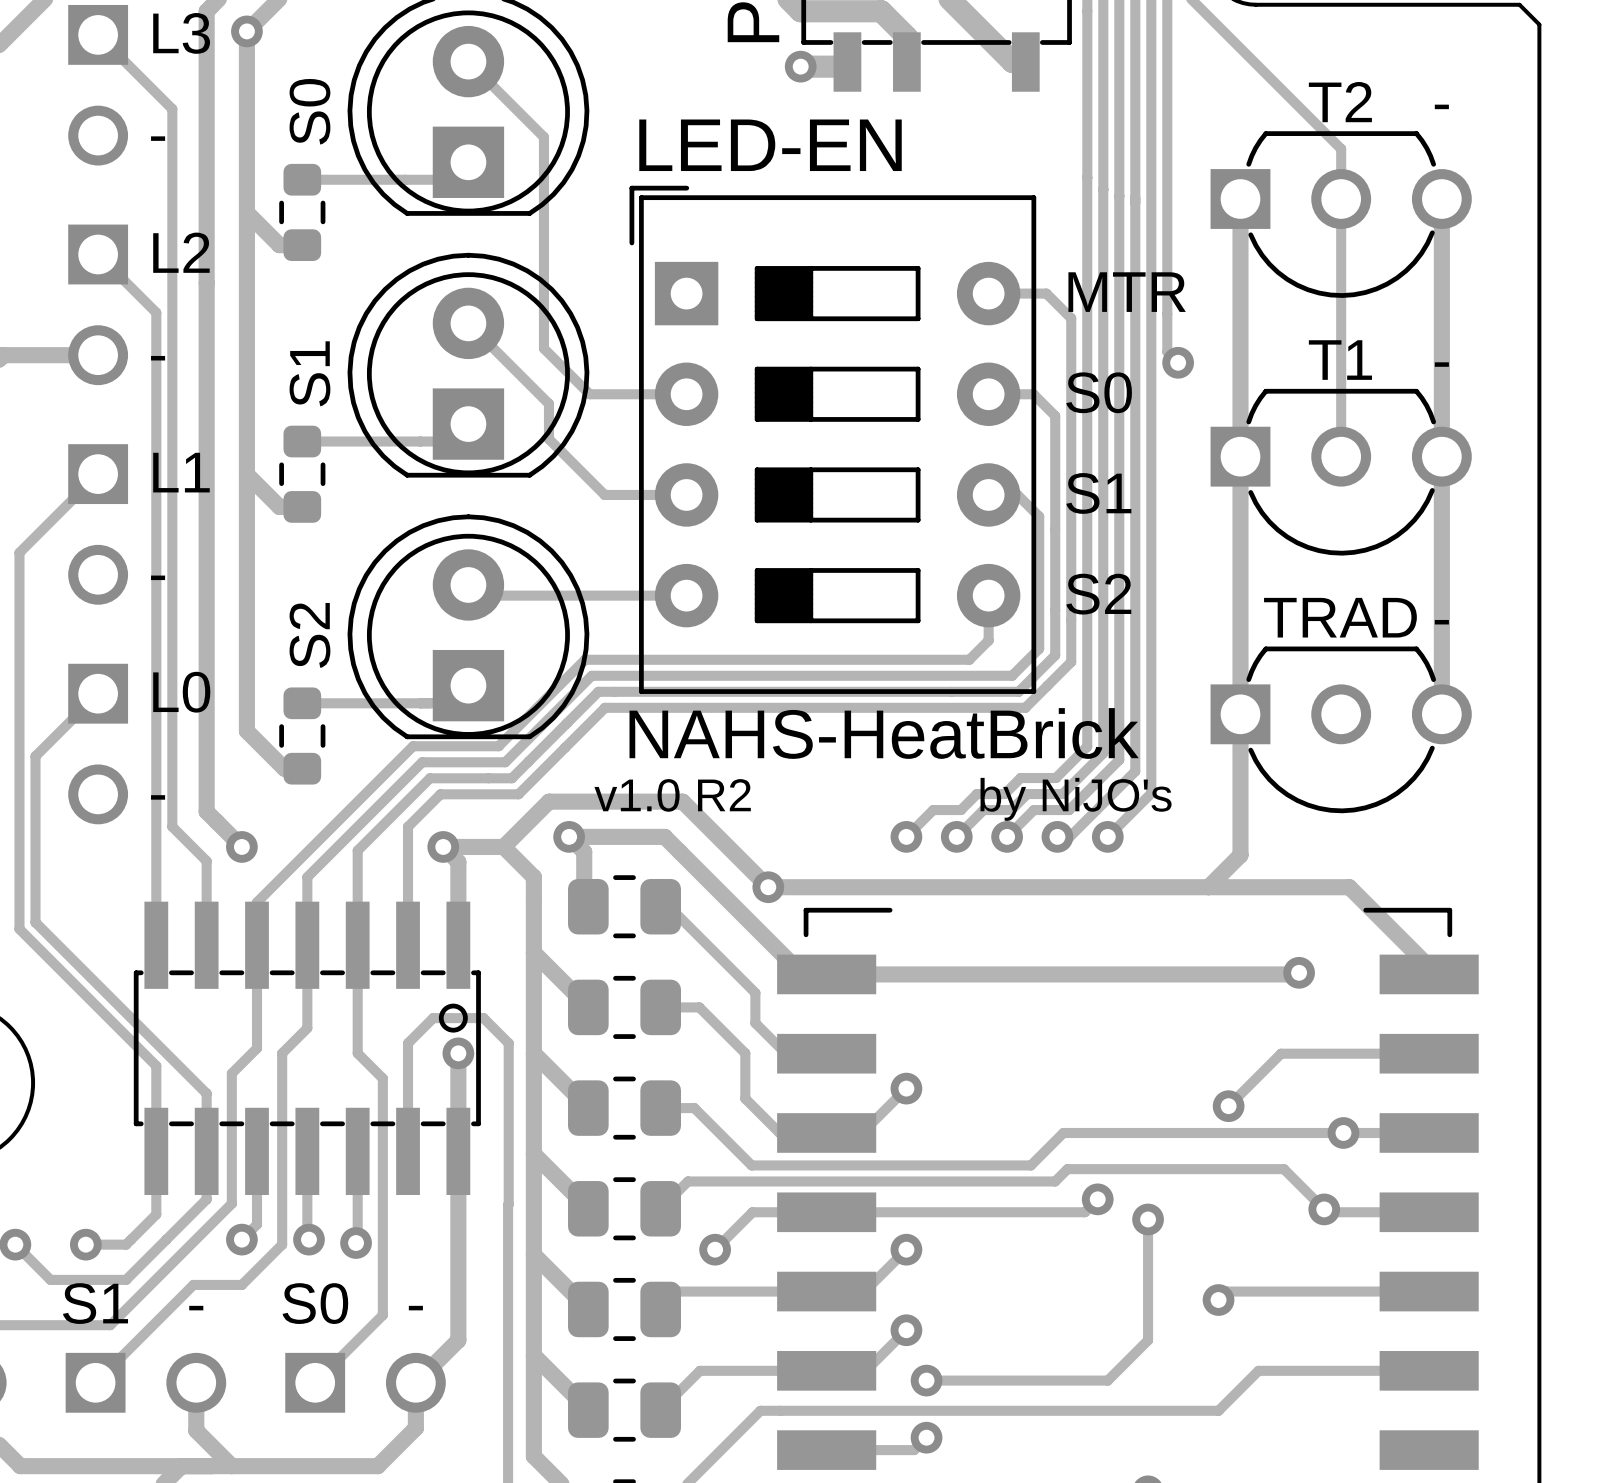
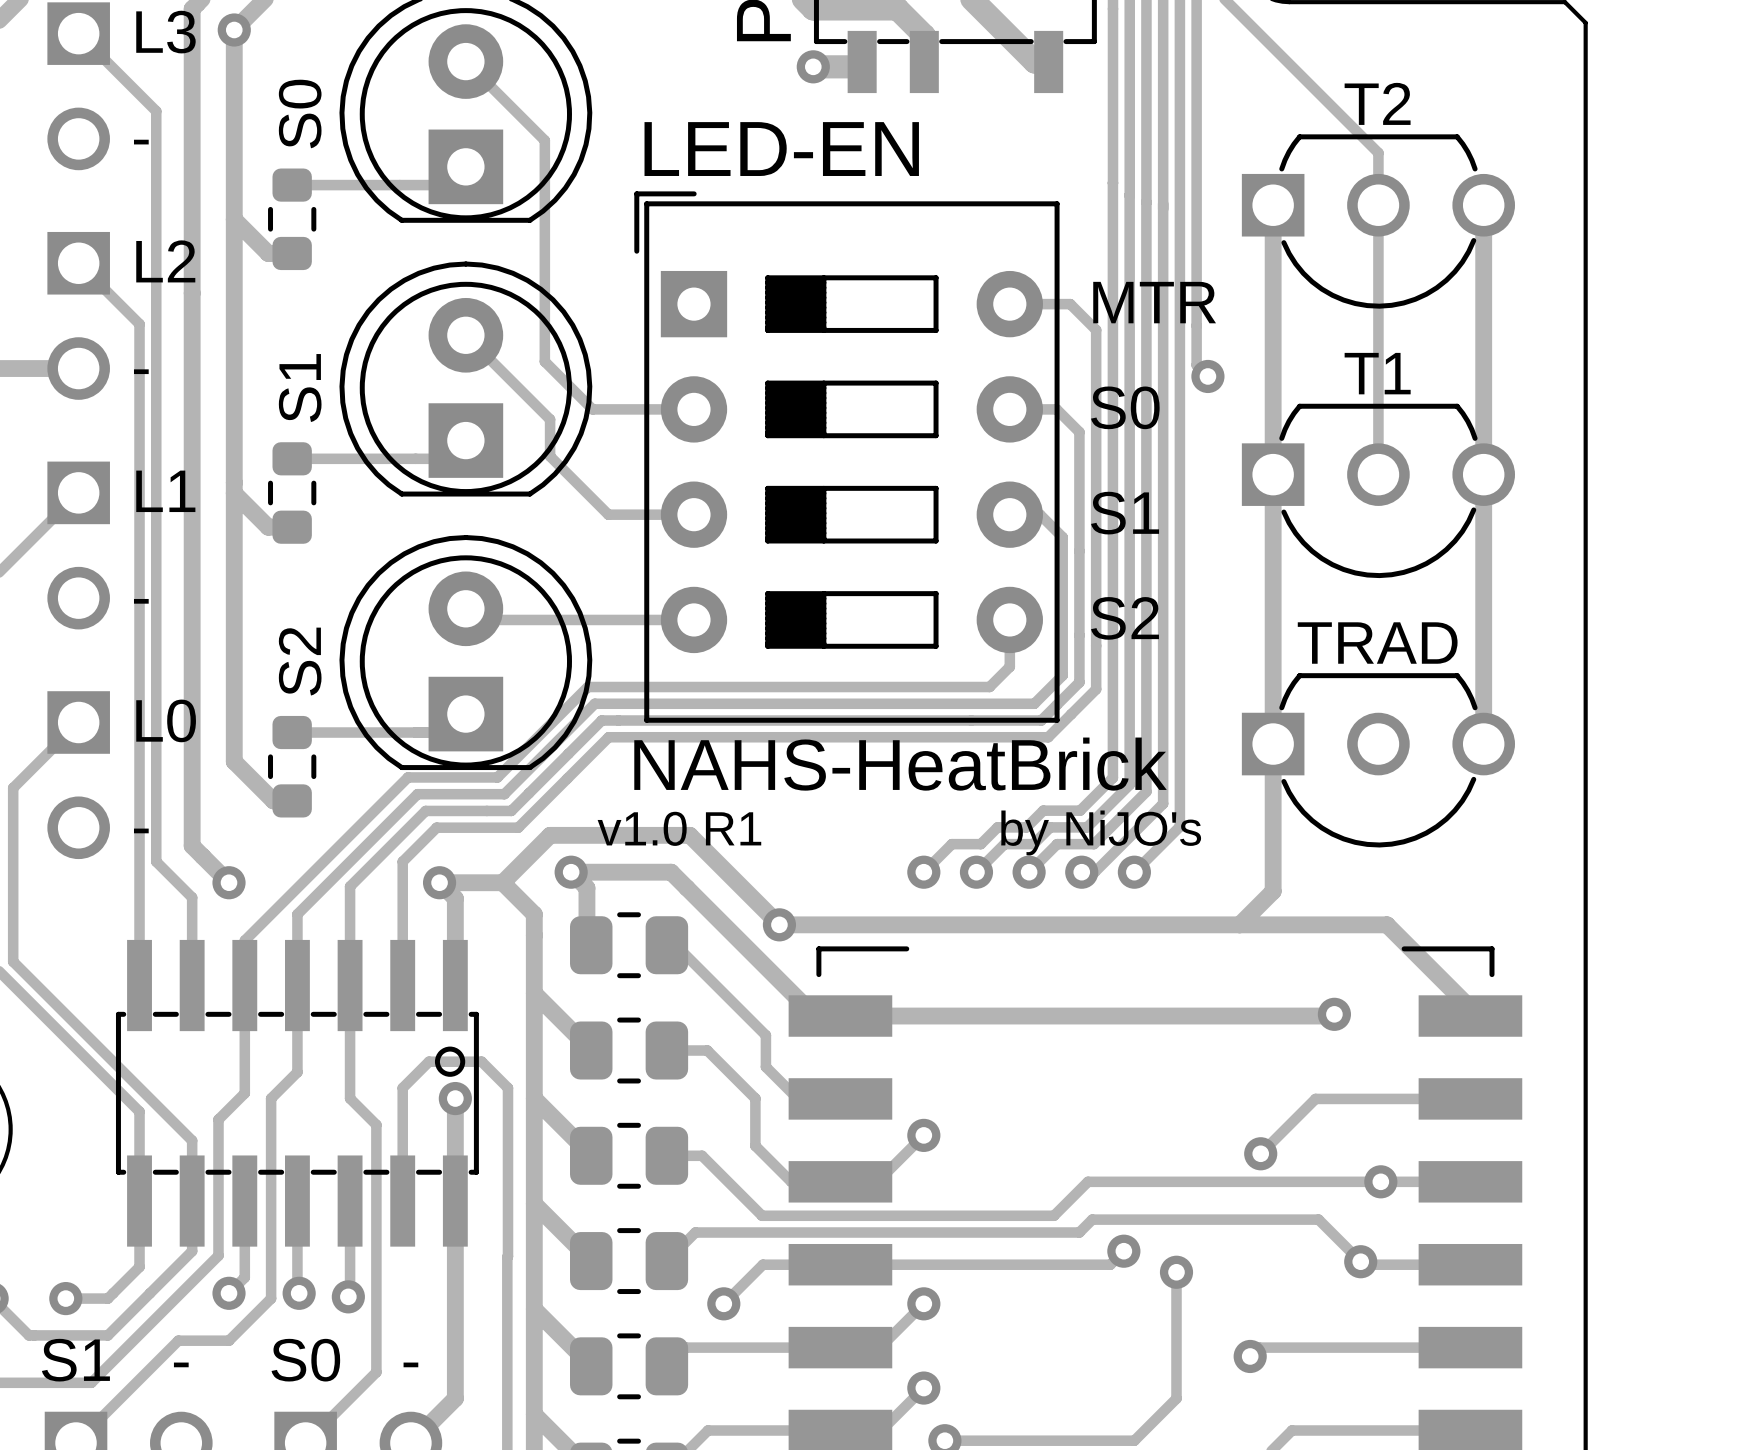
part text: - (1441, 106) -> none
part text: - (1441, 364) -> none
part text: - (1441, 622) -> none
text: v1.0 R2 (672, 795) -> v1.0 R1 (679, 828)

